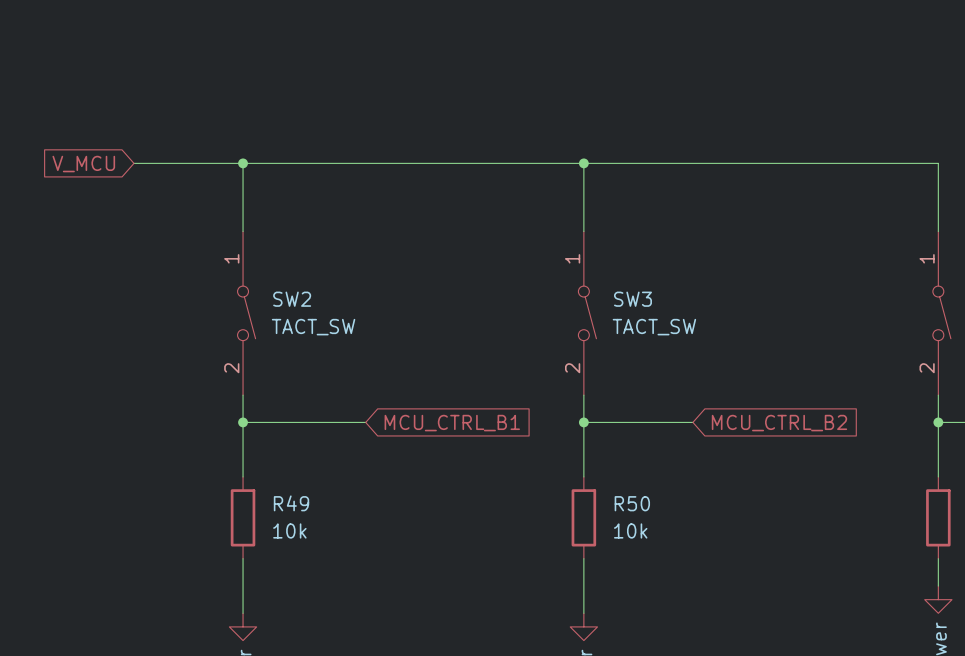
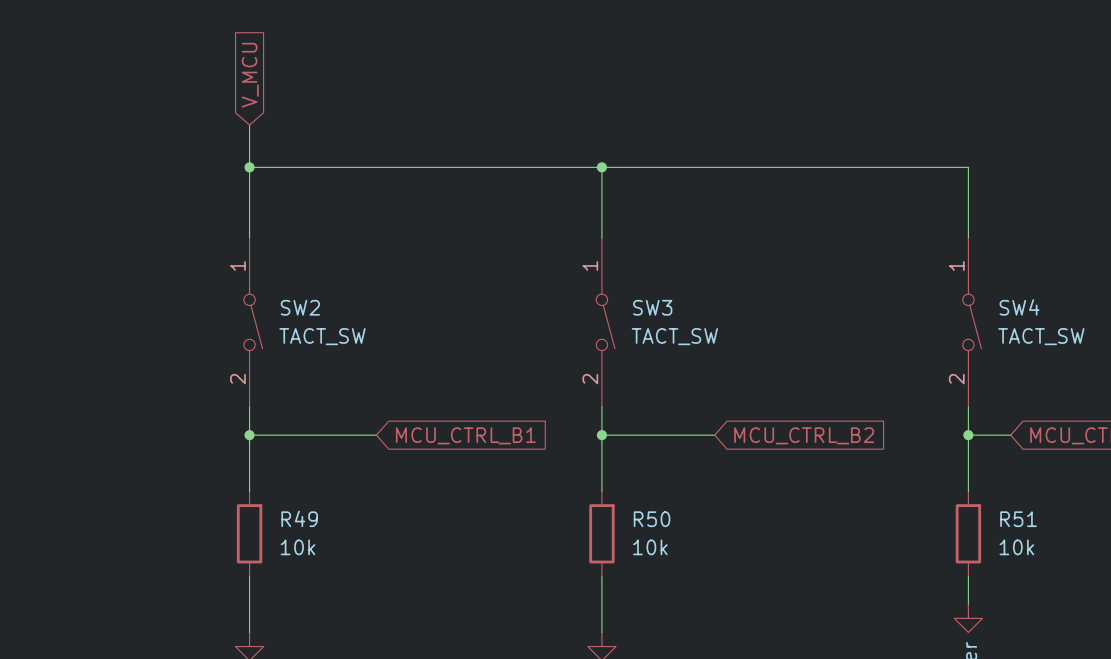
wire: (133, 163) (243, 163) -> (249, 125) (249, 167)
global label rotation: 0° (83, 164) -> 90° clockwise (250, 75)
global label position: V_MCU (83, 164) -> V_MCU (250, 75)

